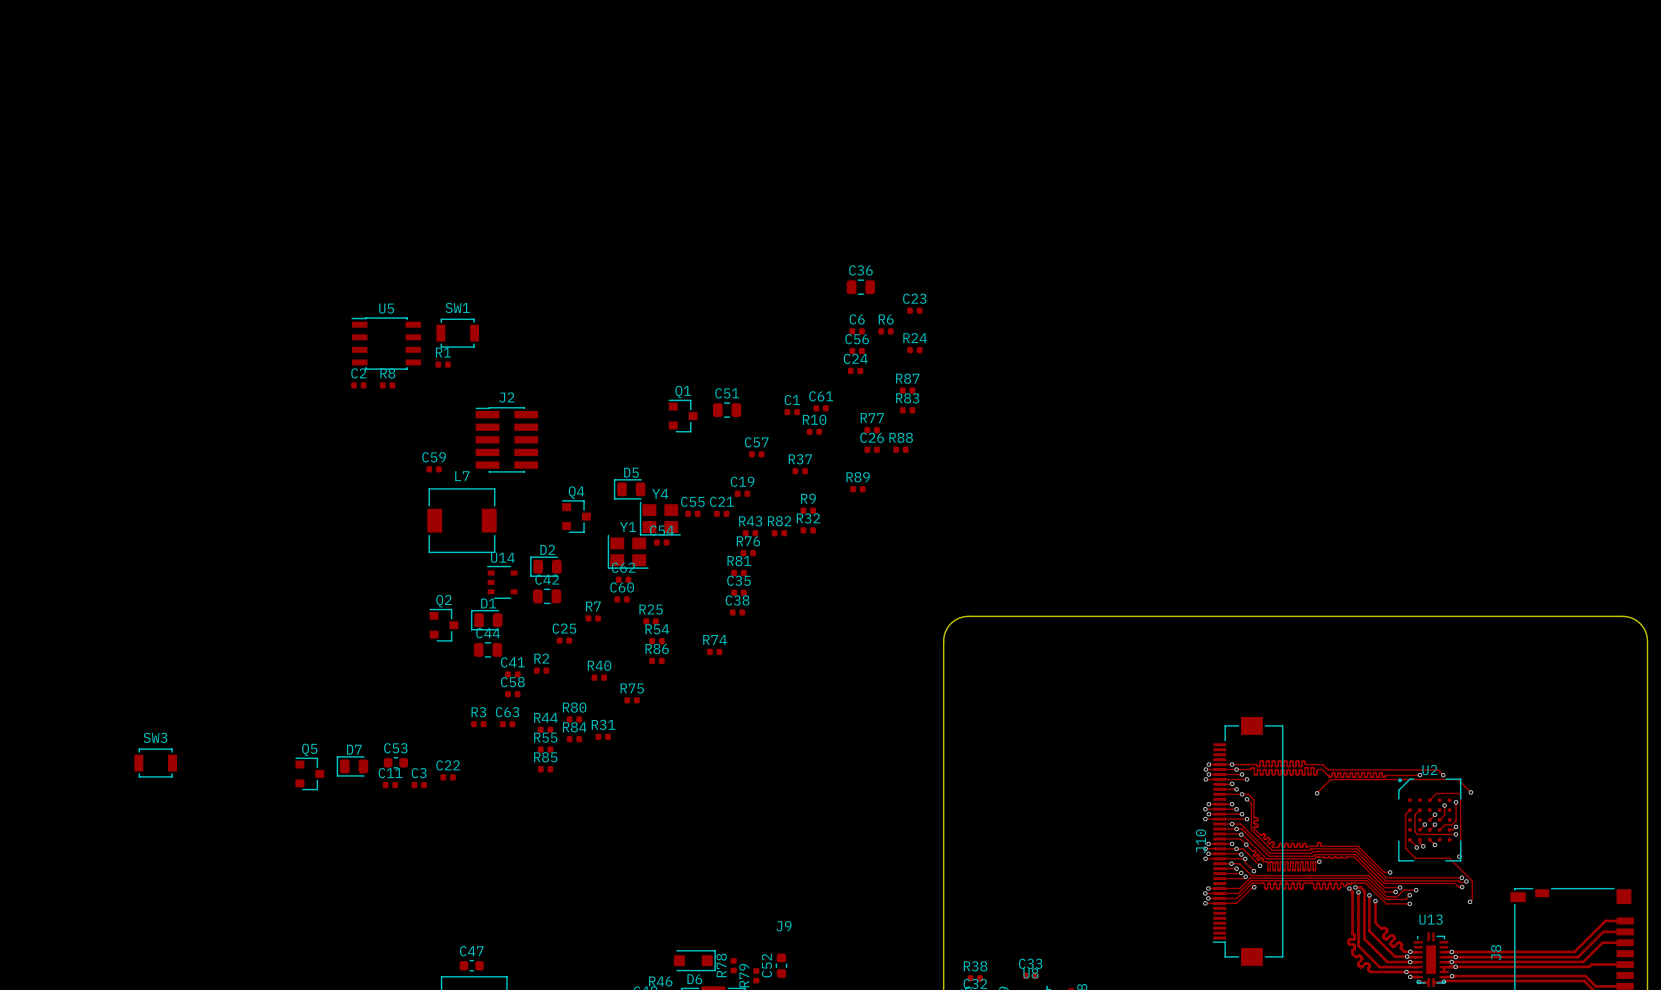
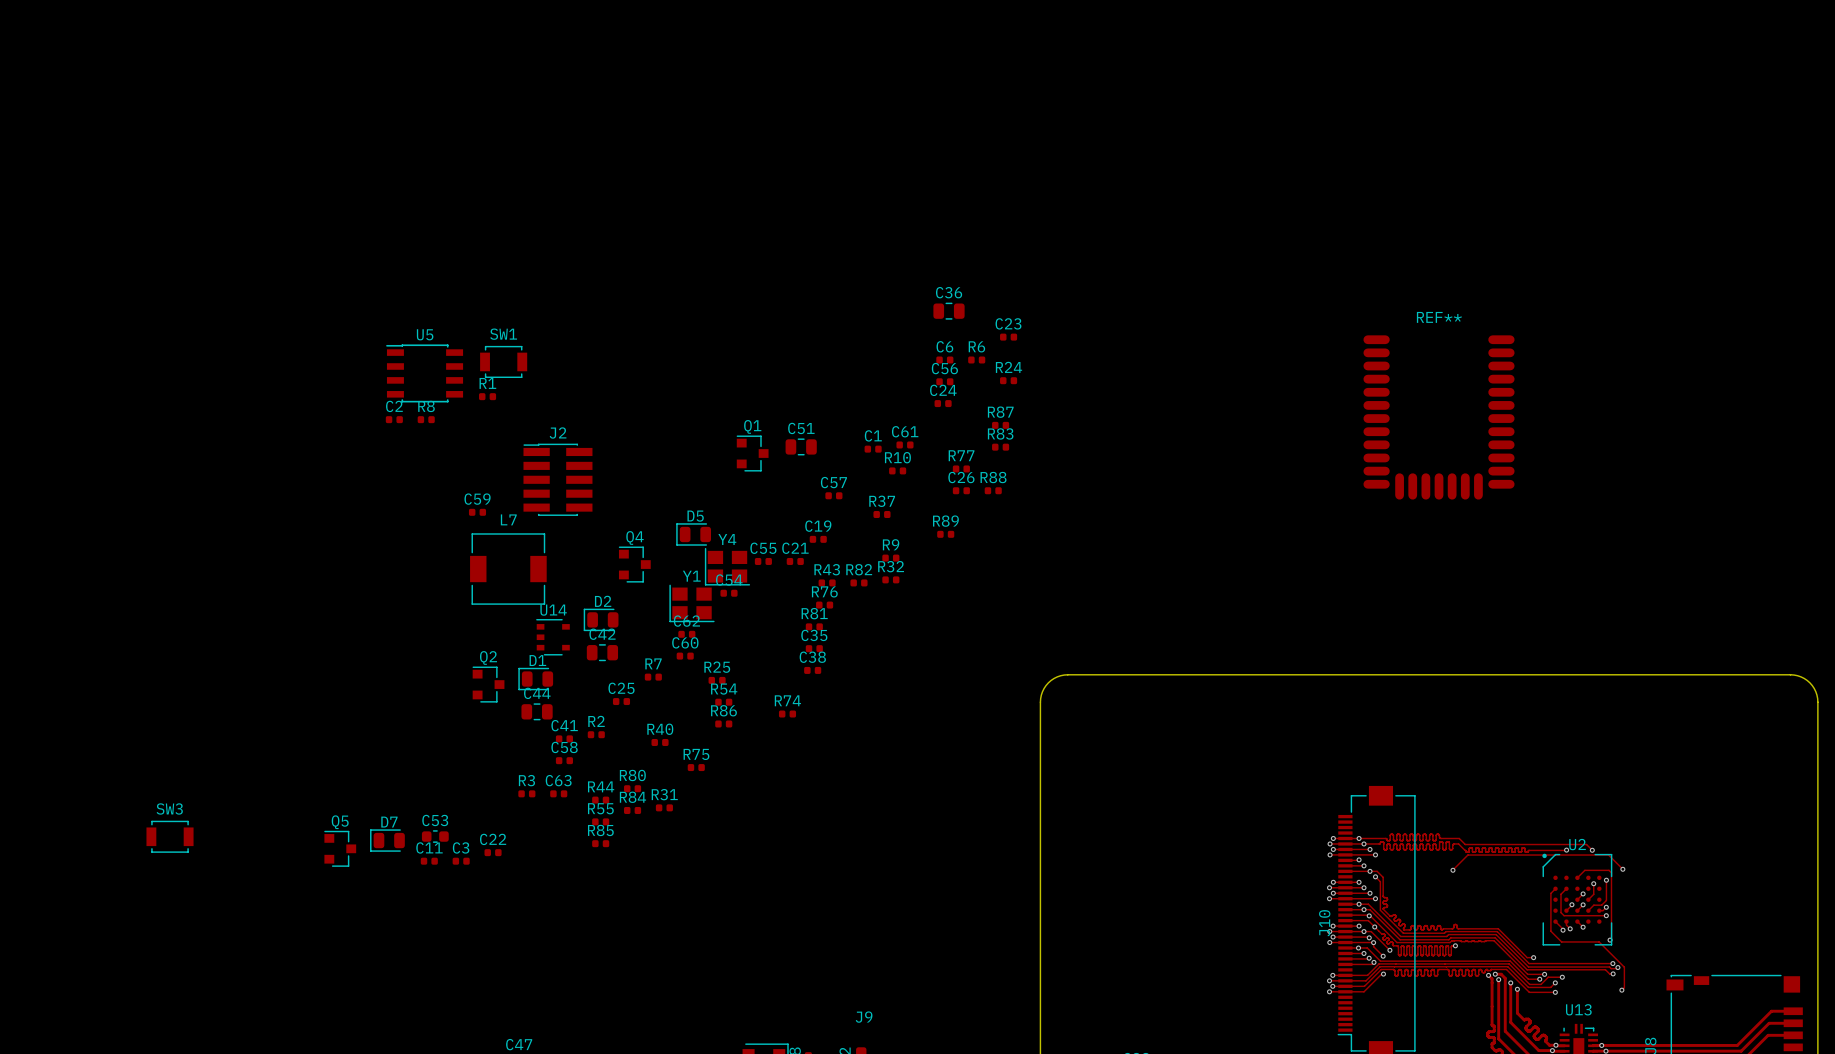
REF**: none -> (1439, 417)

